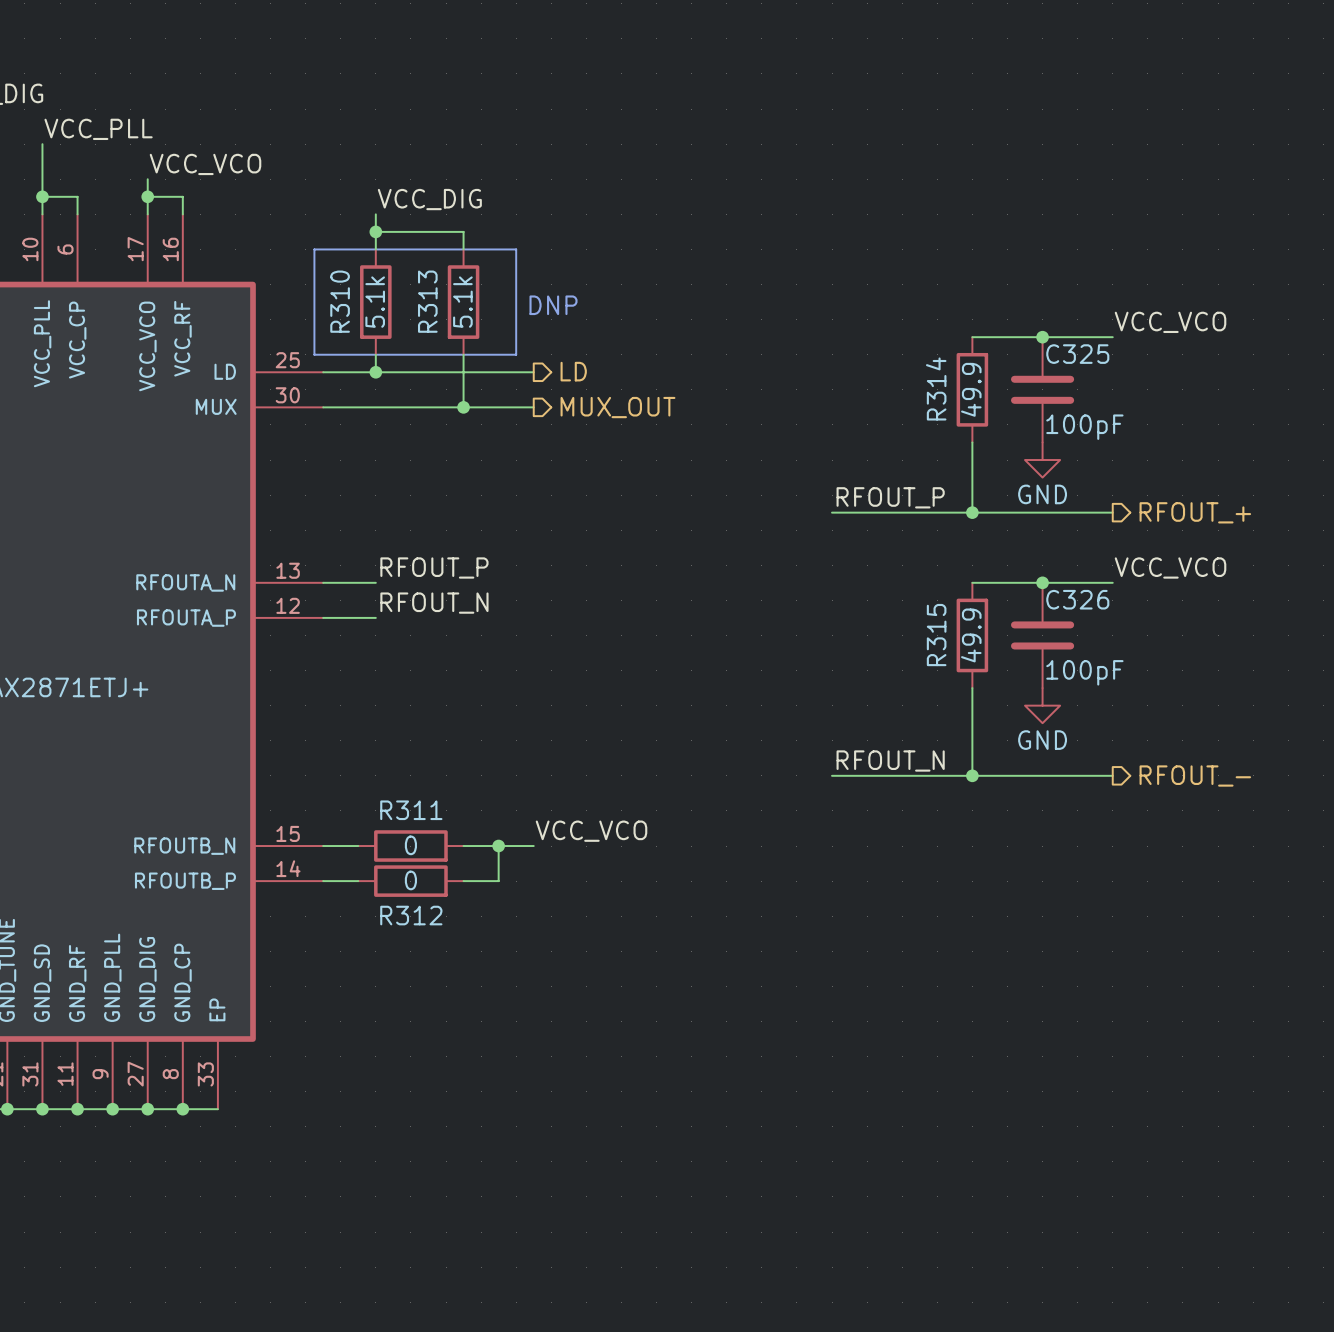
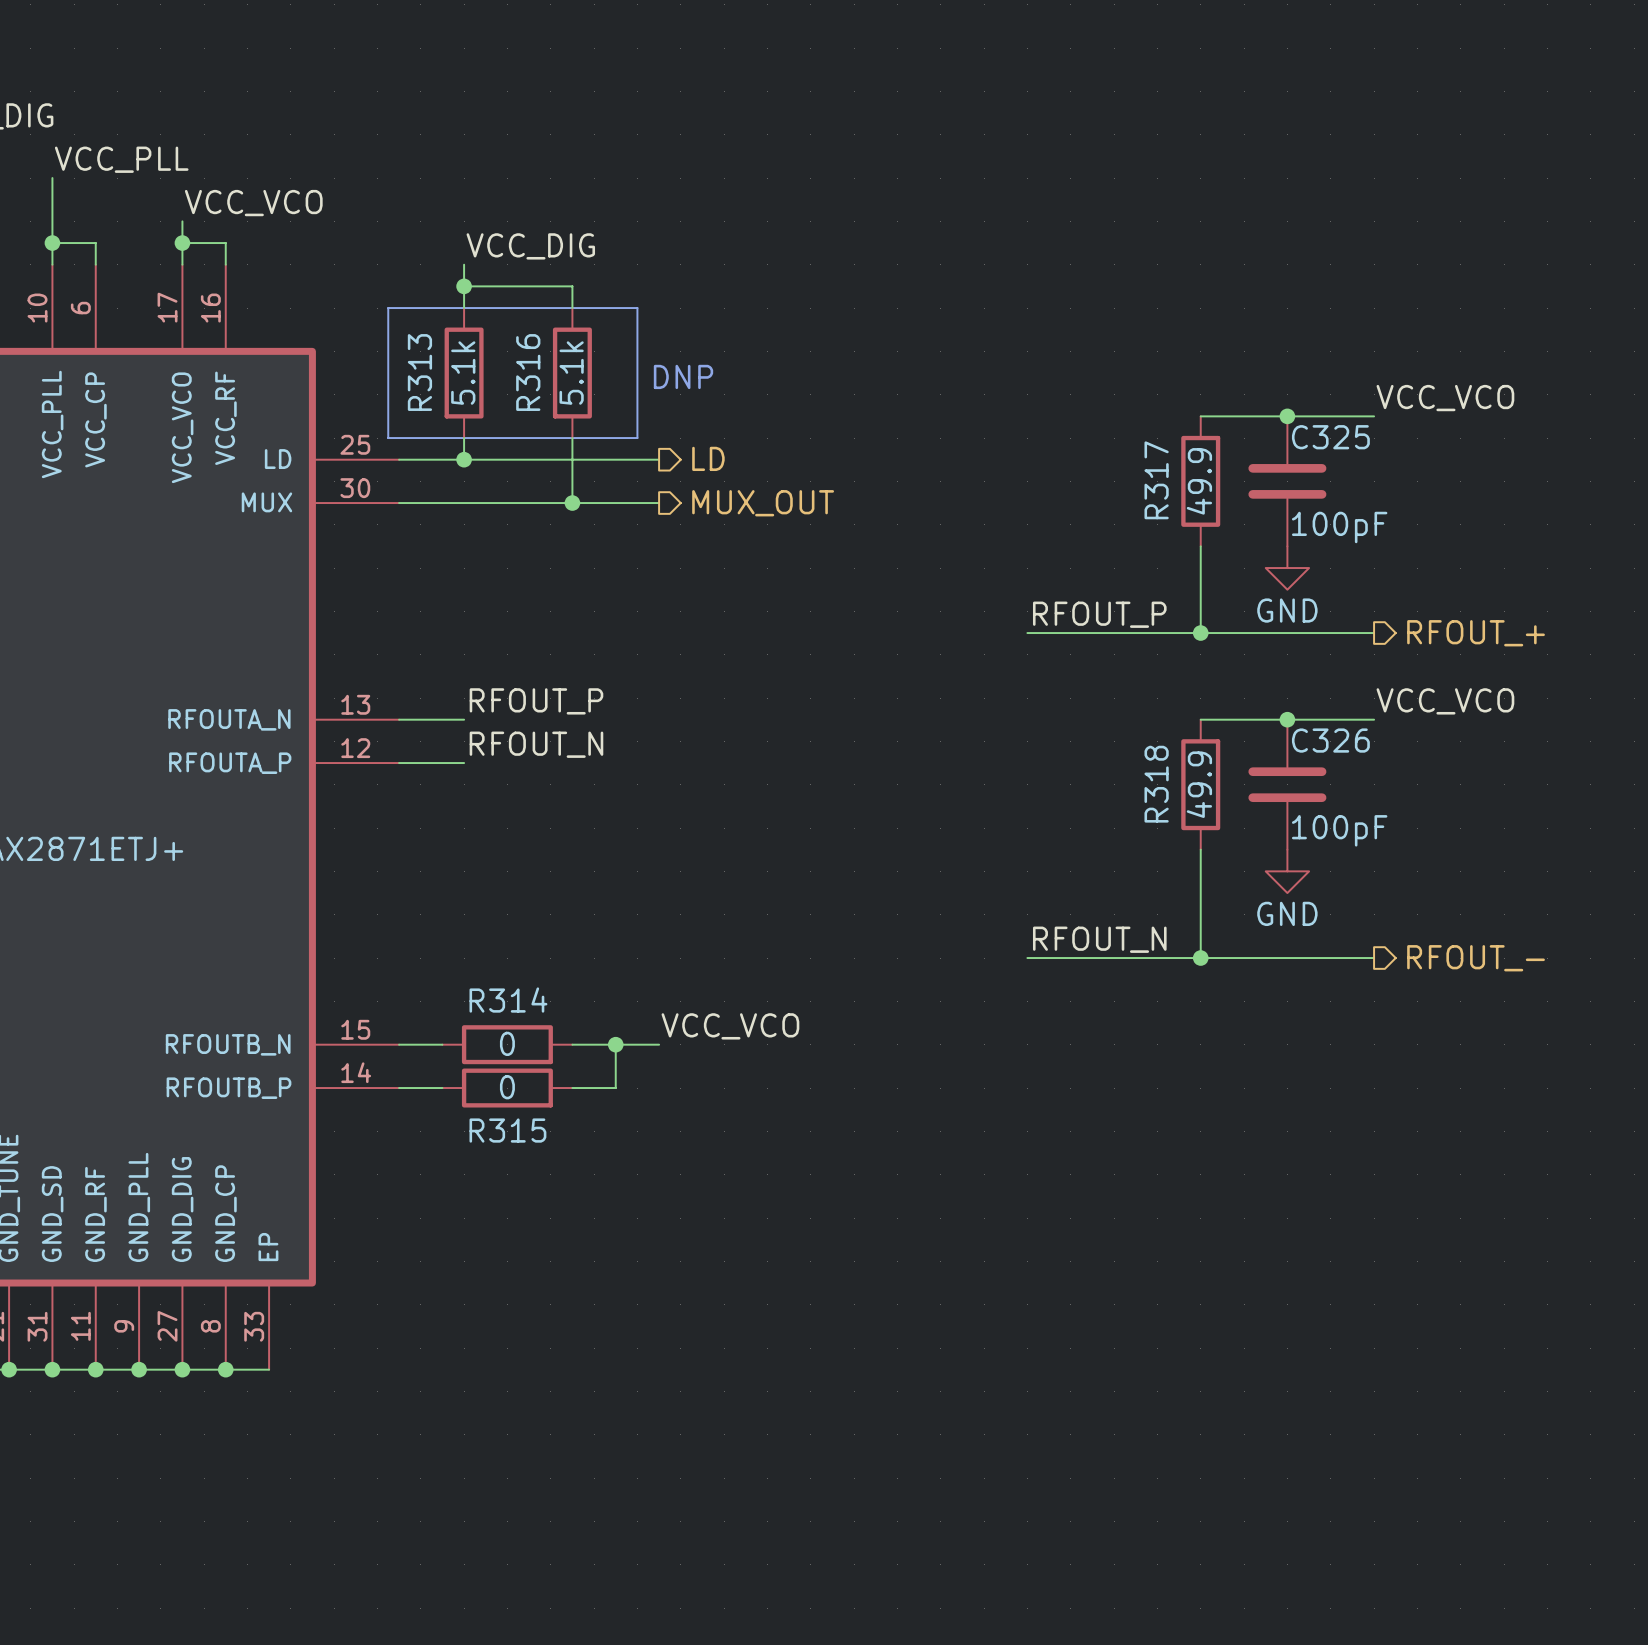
R310 name: R310 (340, 301) -> R313 (419, 372)
R313 name: R313 (427, 301) -> R316 (528, 372)
R314 name: R314 (936, 388) -> R317 (1156, 480)
R315 name: R315 (936, 635) -> R318 (1156, 784)
R311 name: R311 (411, 810) -> R314 (508, 1000)
R312 name: R312 (411, 915) -> R315 (507, 1130)

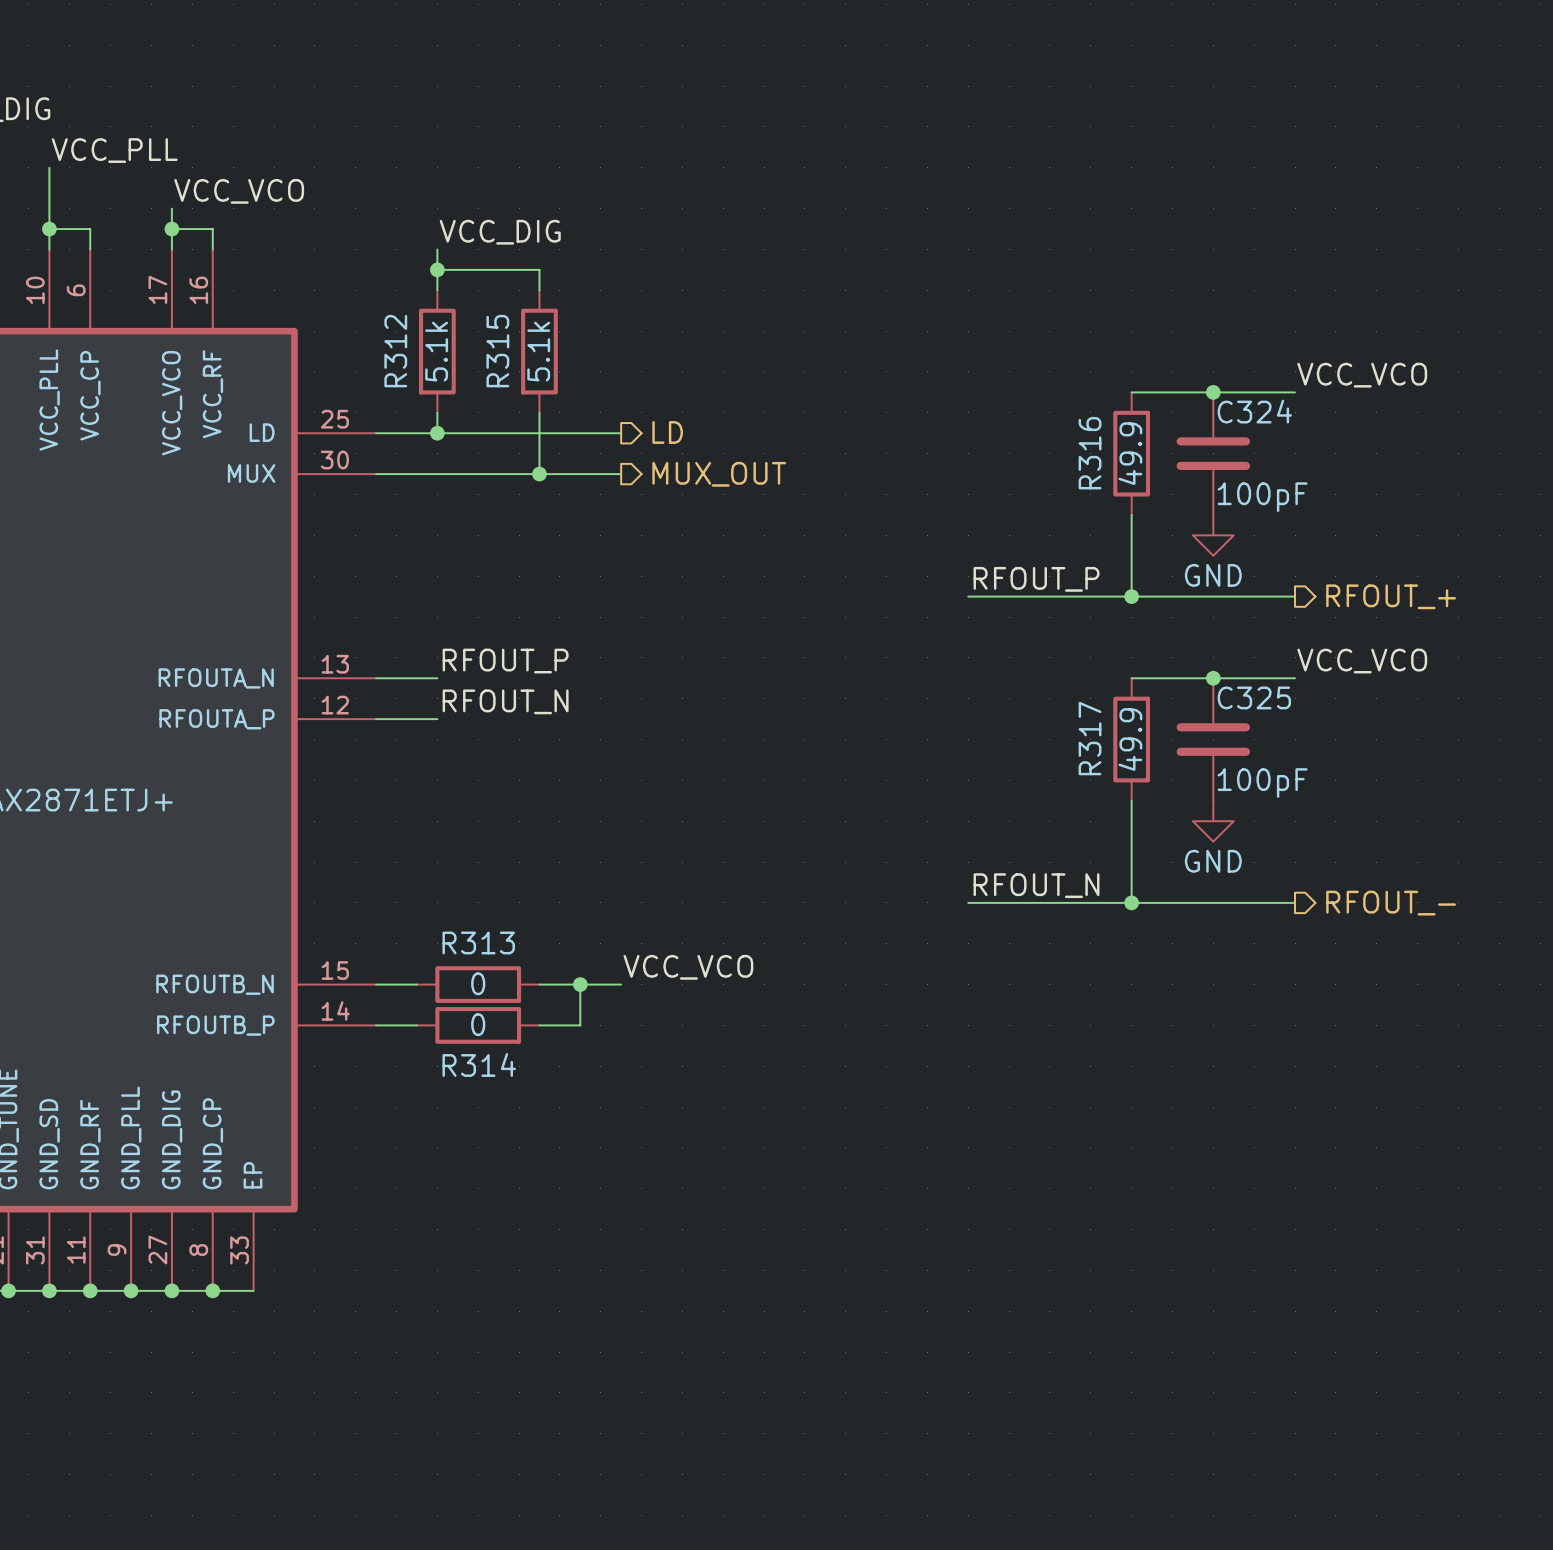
line: (388, 308) (388, 438) (637, 438) (637, 308) (388, 308) -> none
R313 name: R313 (419, 372) -> R312 (395, 351)
R316 name: R316 (528, 372) -> R315 (497, 351)
text: DNP (683, 376) -> none
C325 name: C325 (1330, 437) -> C324 (1254, 411)
R317 name: R317 (1156, 480) -> R316 (1090, 453)
C326 name: C326 (1330, 740) -> C325 (1254, 697)
R318 name: R318 (1156, 784) -> R317 (1090, 738)
R314 name: R314 (508, 1000) -> R313 (478, 942)
R315 name: R315 (507, 1130) -> R314 (479, 1065)

